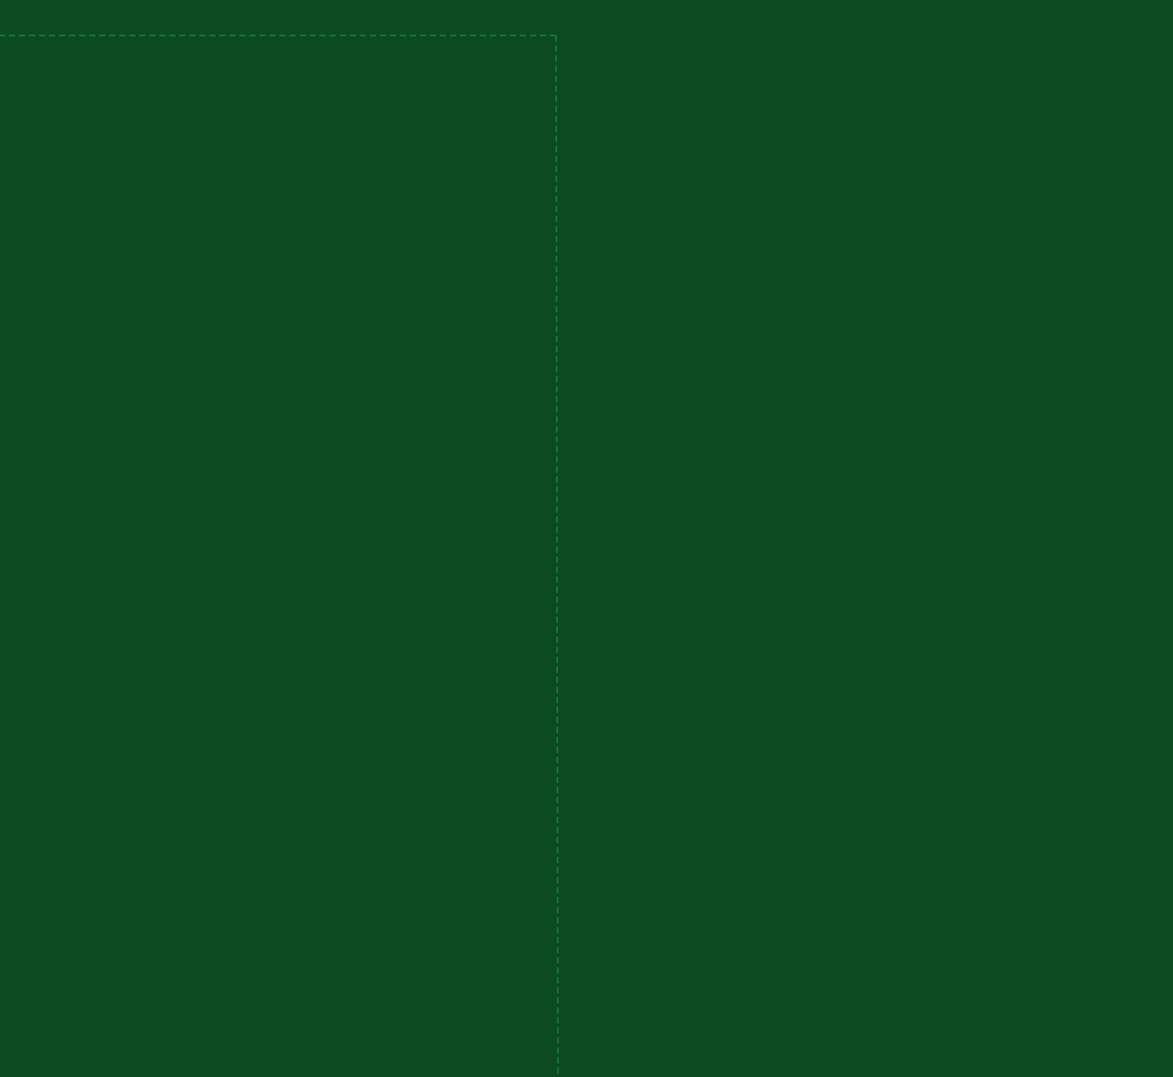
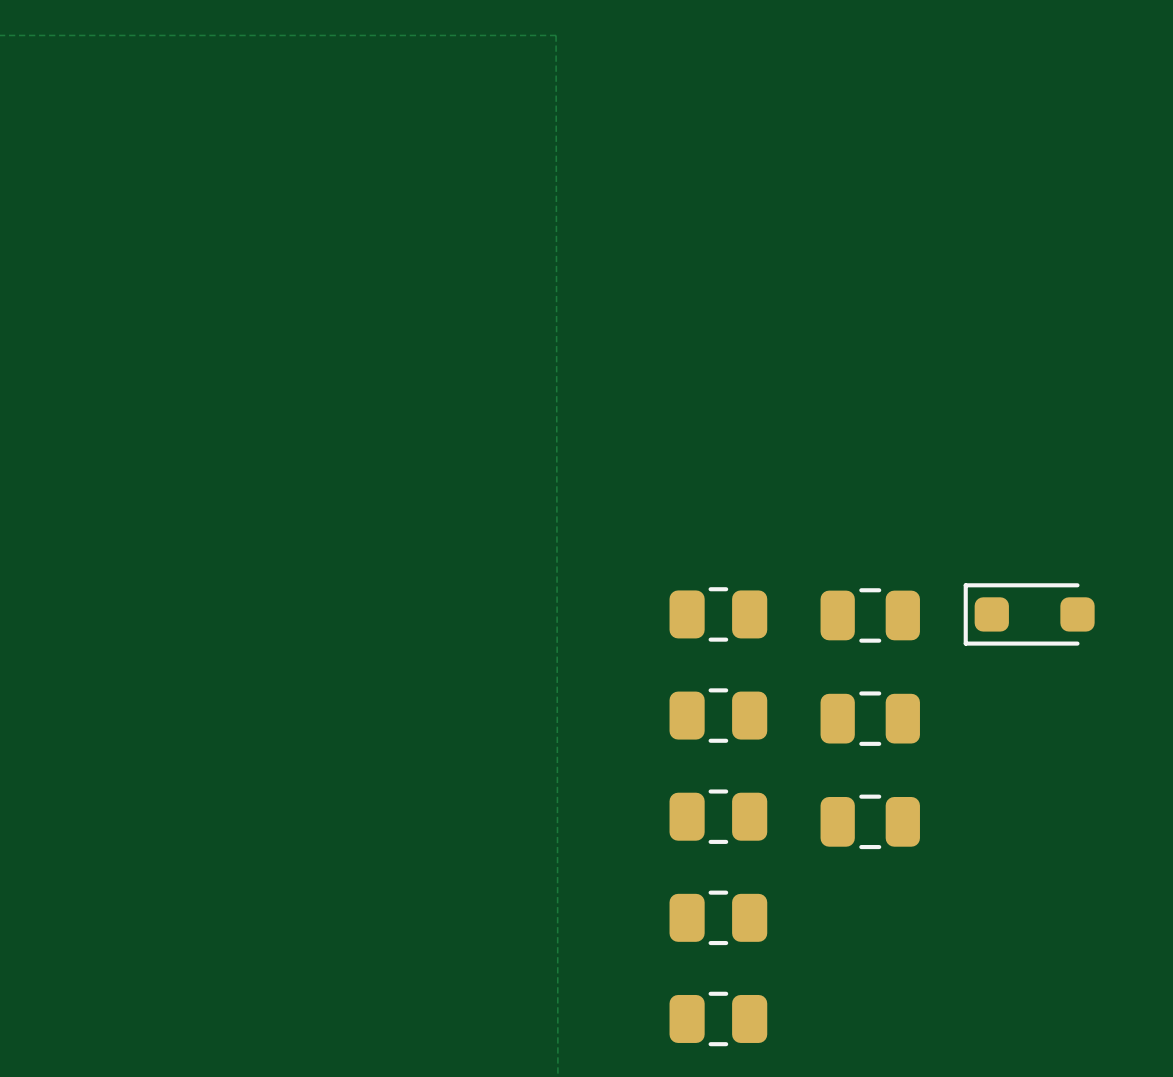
part: none -> (718, 614)
part: none -> (1029, 614)
part: none -> (870, 615)
part: none -> (718, 715)
part: none -> (870, 718)
part: none -> (718, 816)
part: none -> (870, 821)
part: none -> (718, 917)
part: none -> (718, 1018)

